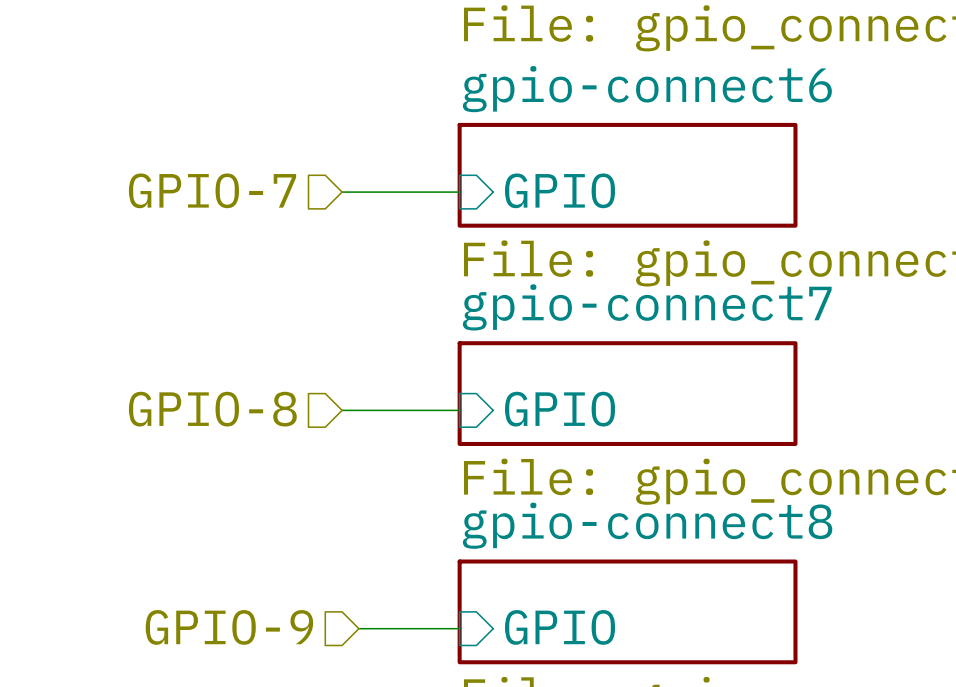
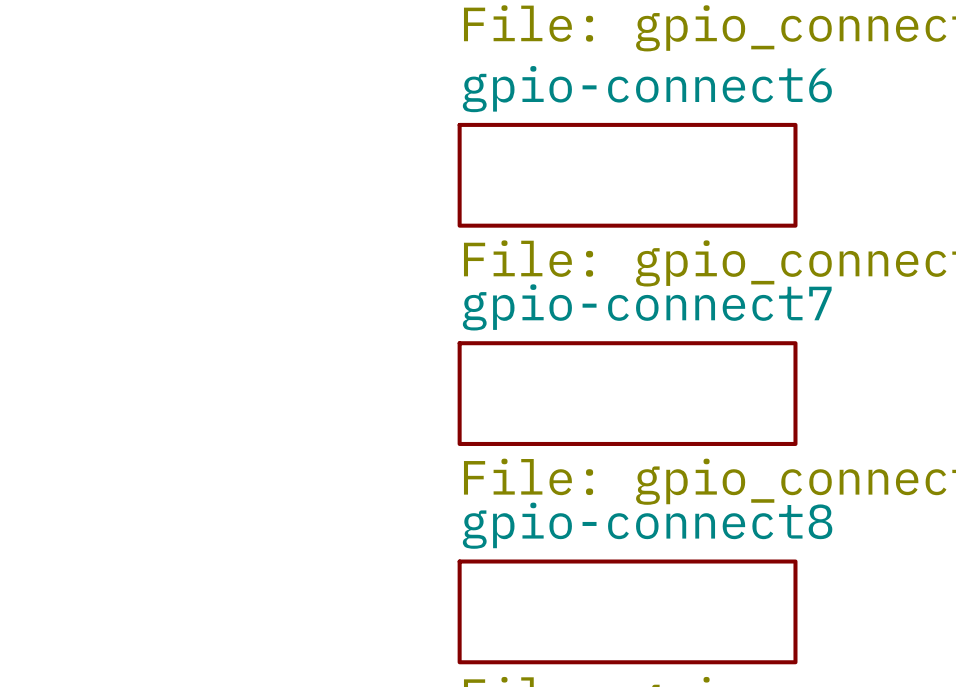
hierarchical label: GPIO-7 (212, 190) -> none
sheet pin: GPIO (560, 190) -> none
wire: (342, 192) (459, 192) -> none
hierarchical label: GPIO-8 (212, 409) -> none
sheet pin: GPIO (560, 409) -> none
wire: (342, 410) (459, 410) -> none
hierarchical label: GPIO-9 (229, 627) -> none
sheet pin: GPIO (560, 627) -> none
wire: (358, 628) (459, 628) -> none

